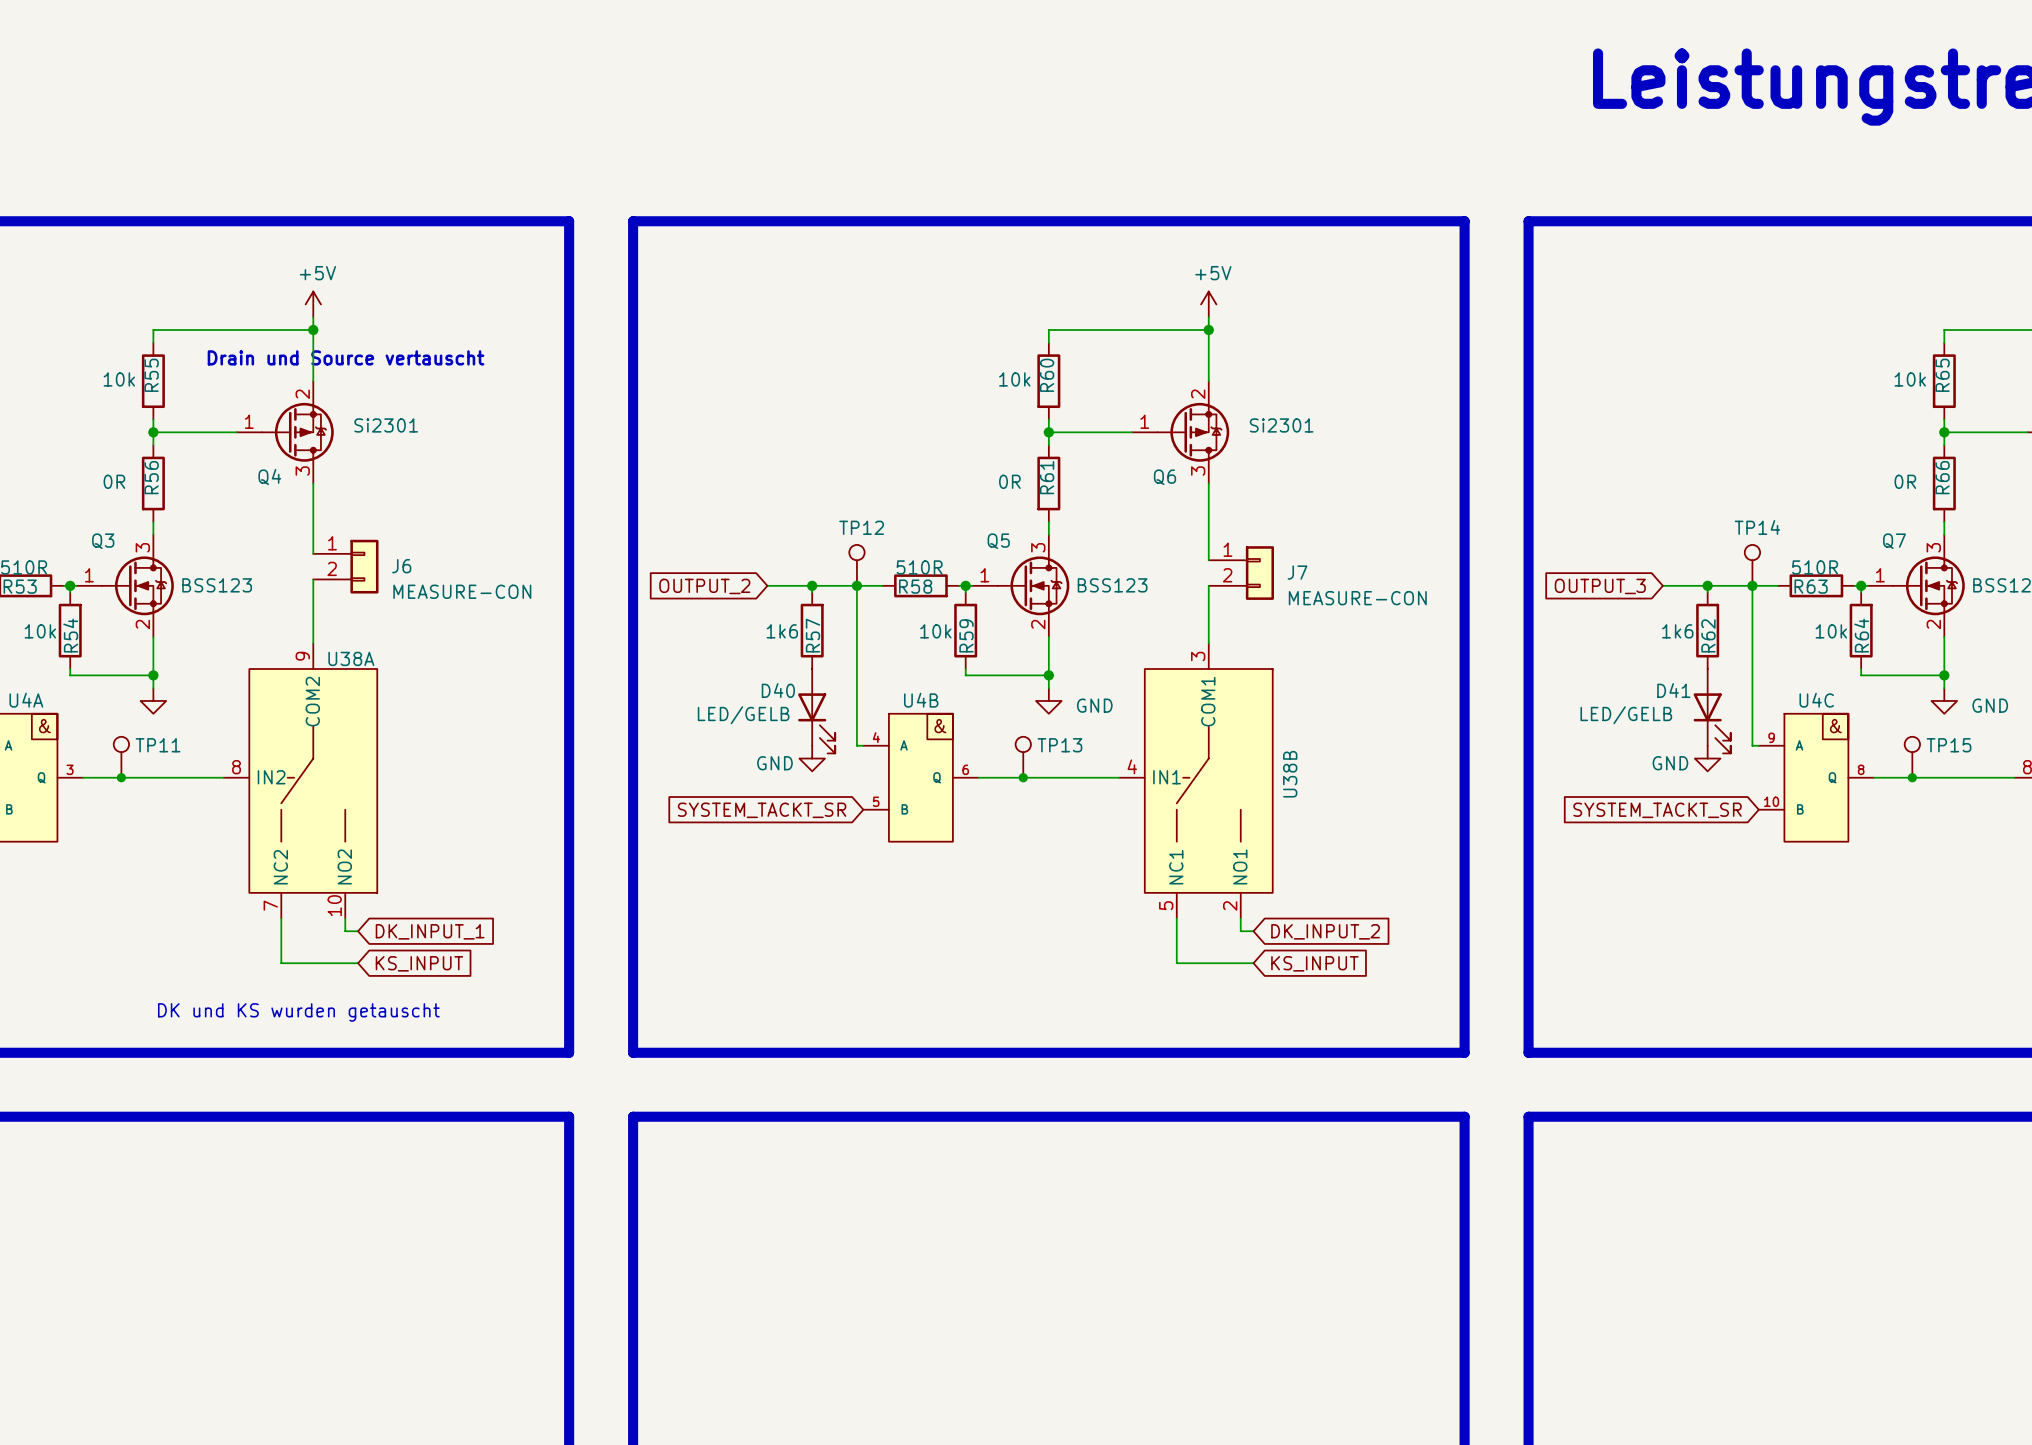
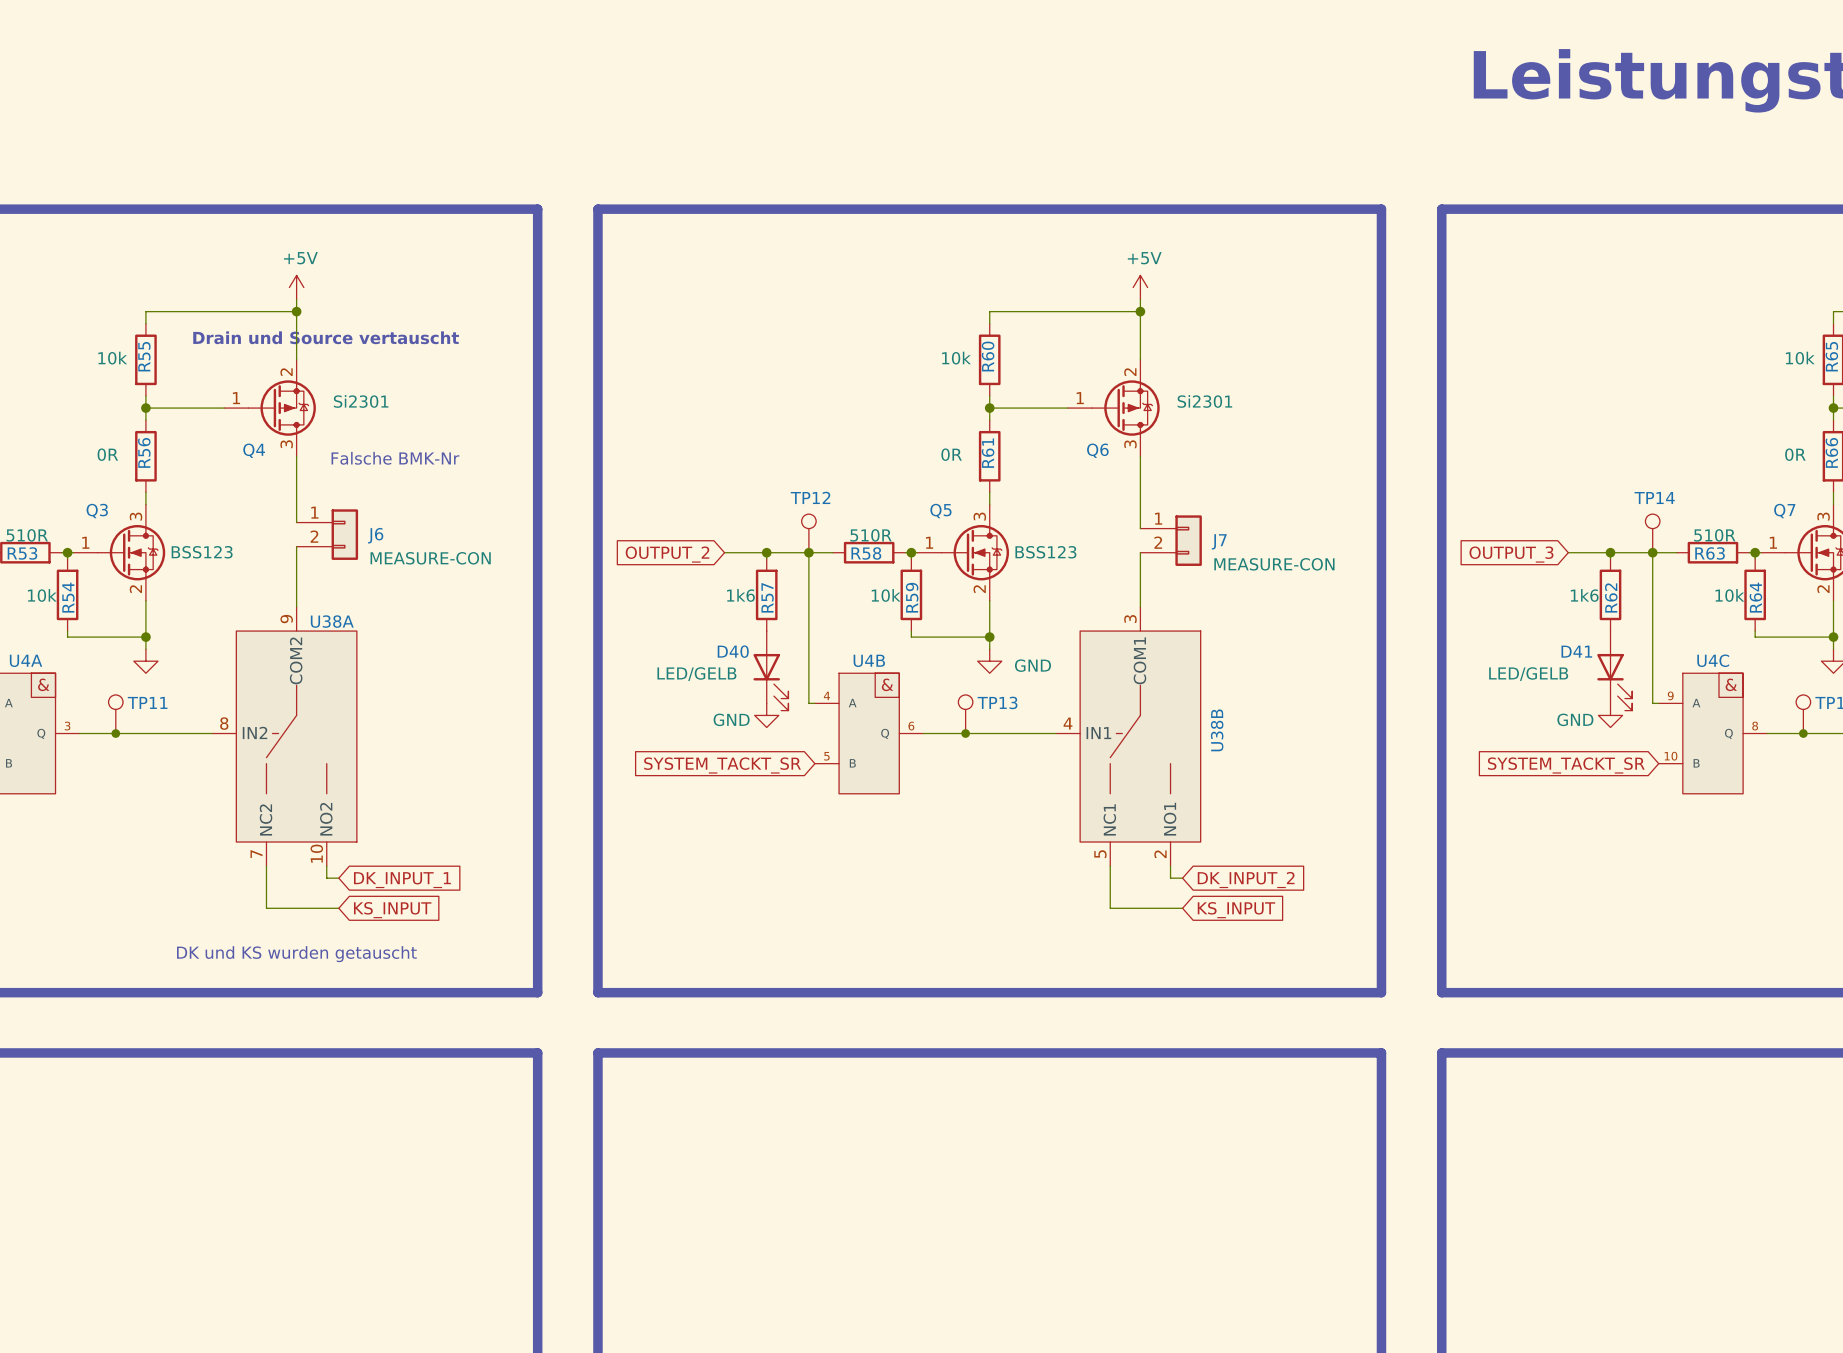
text: none -> Falsche BMK-Nr (395, 458)

